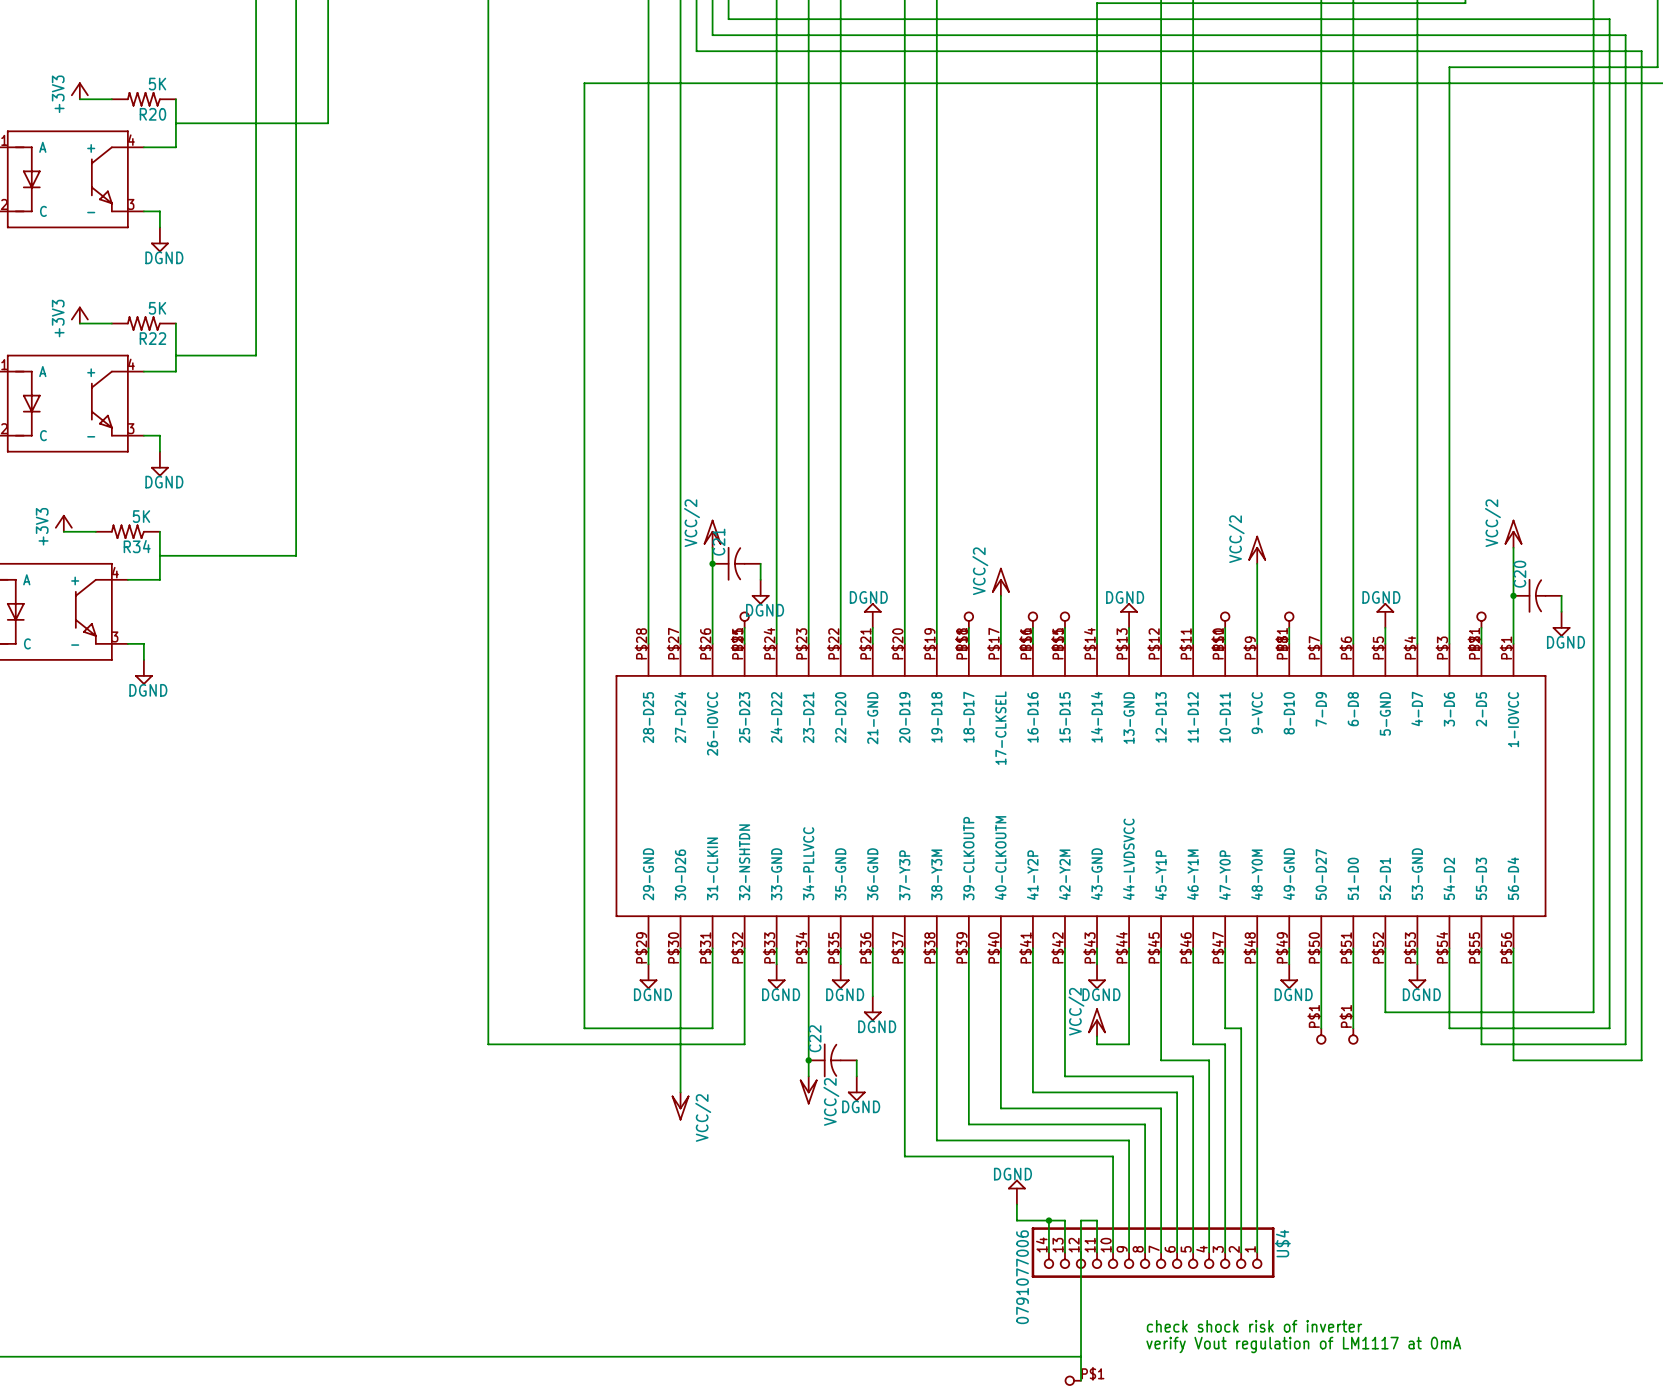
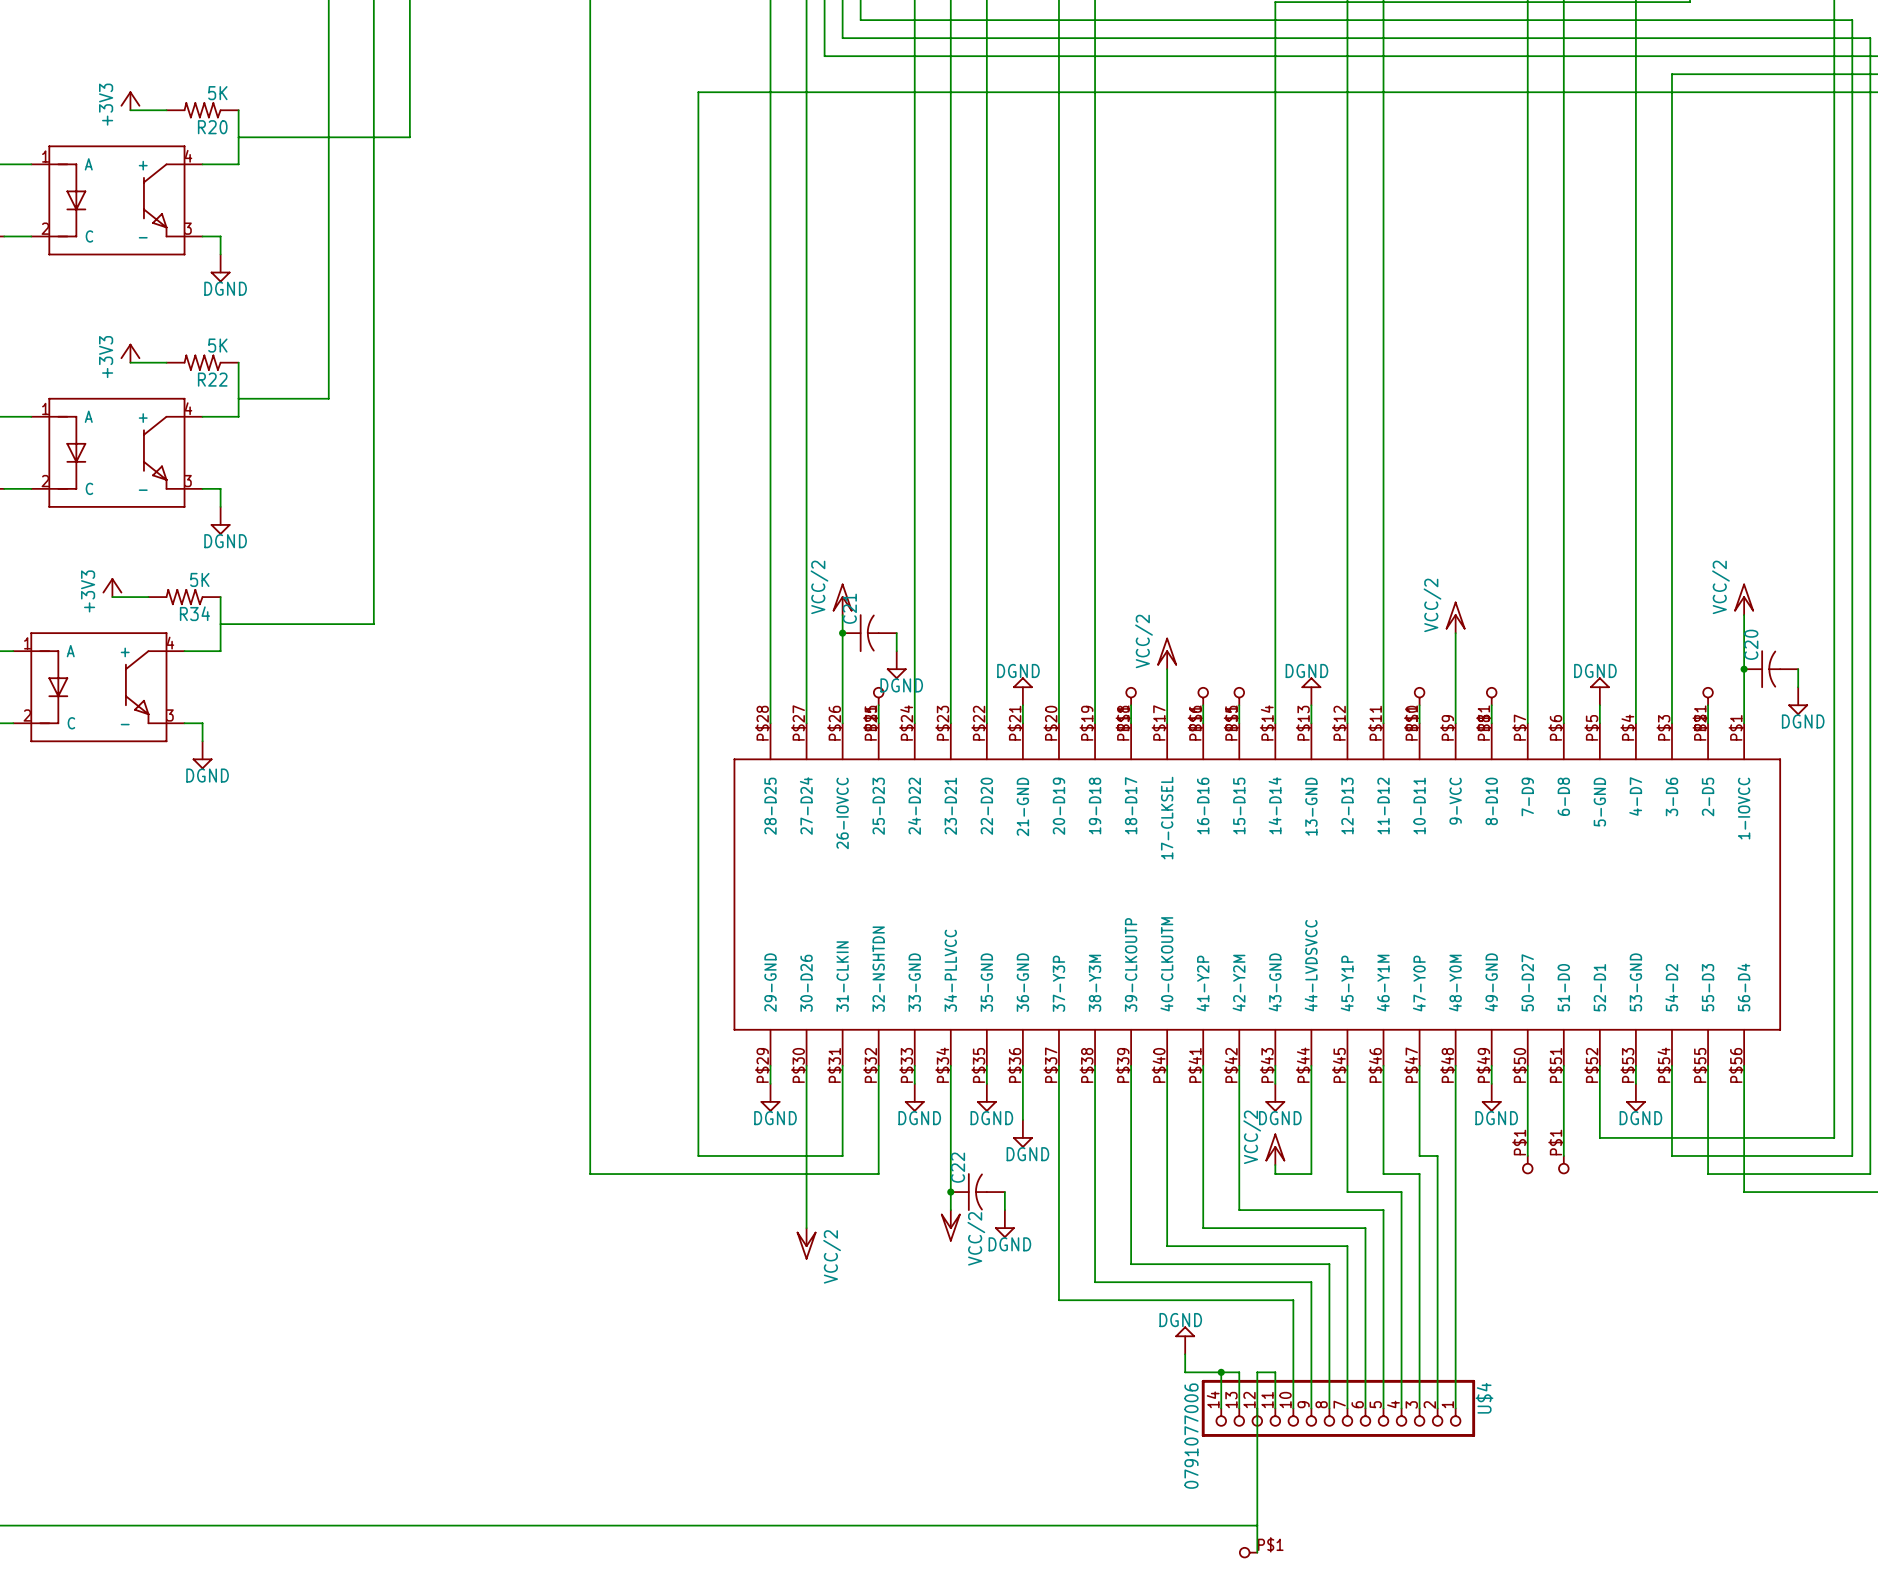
text: check shock risk of inverter (1254, 1326) -> none
text: verify Vout regulation of LM1117 at 0mA (1303, 1344) -> none

